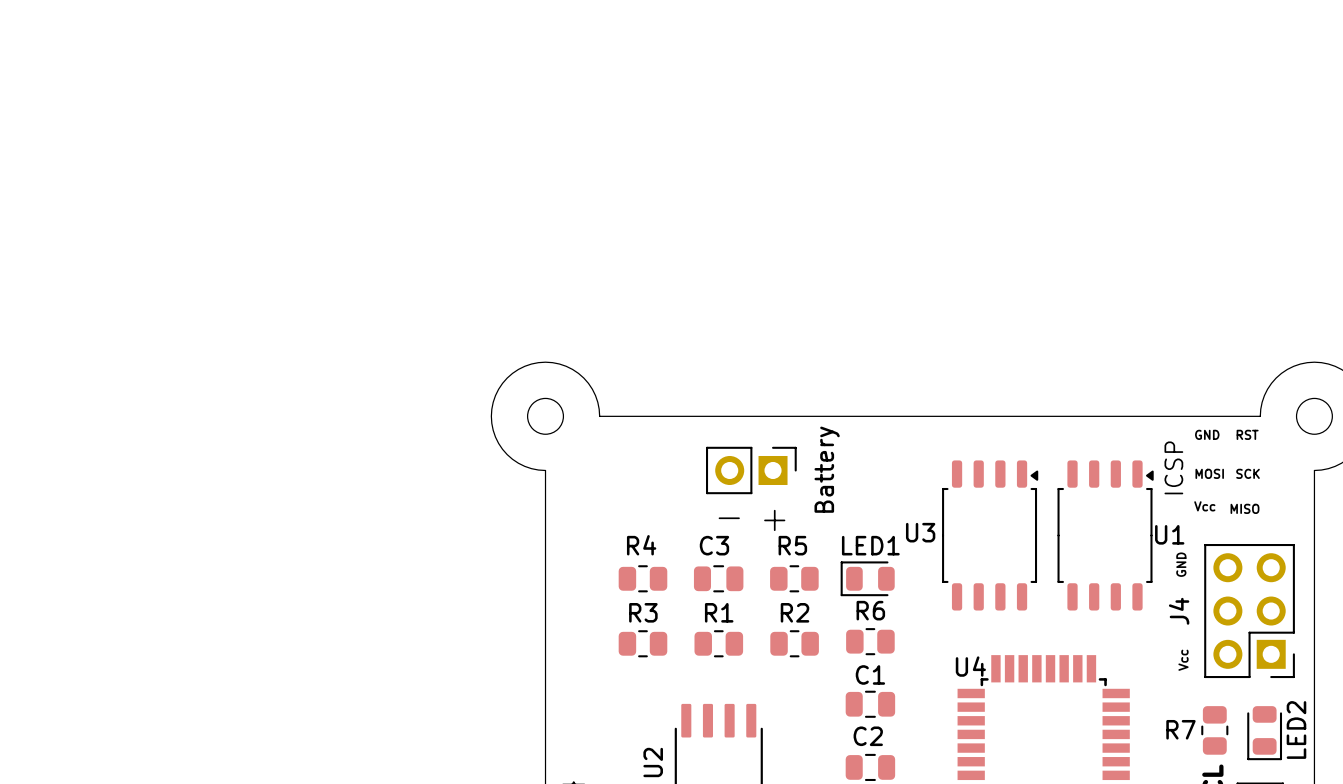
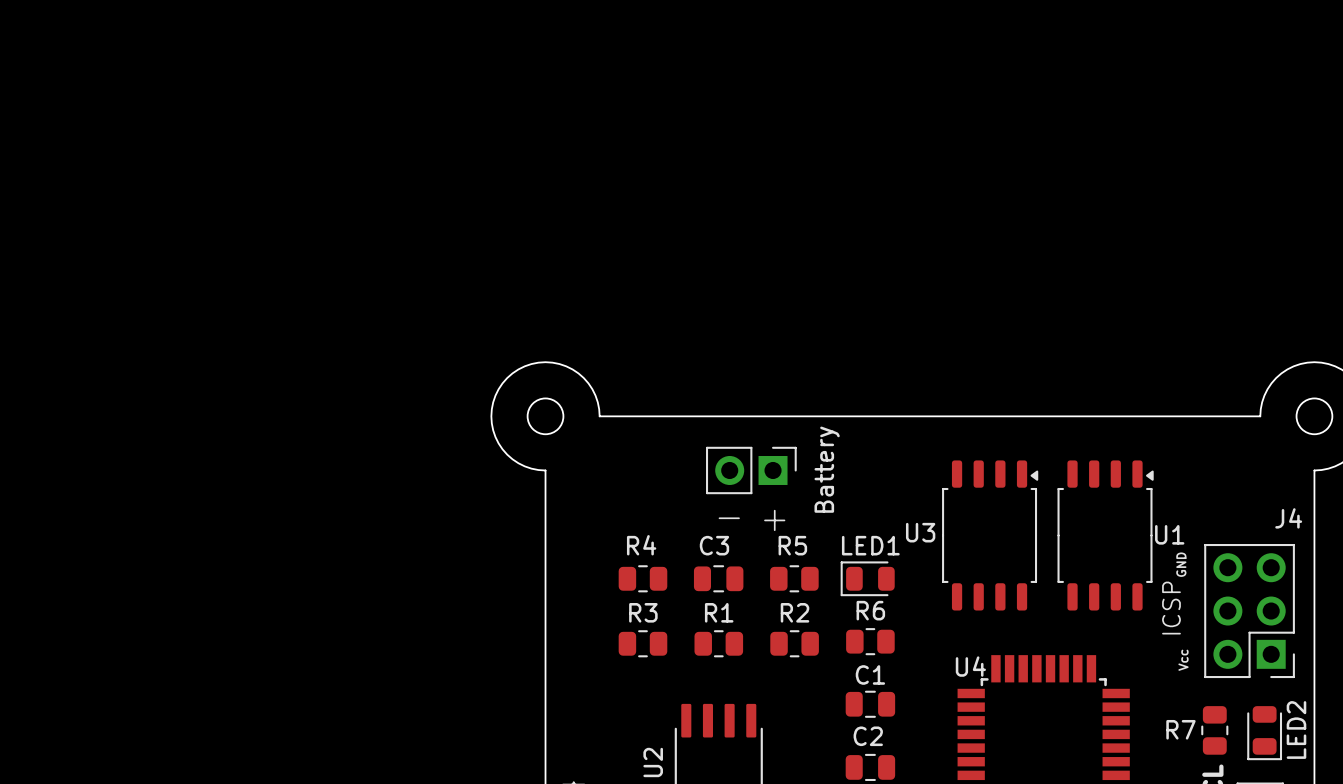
text: GND (1207, 434) -> none
text: RST (1247, 434) -> none
text position: ICSP (1173, 467) -> ICSP (1171, 608)
text: MOSI (1209, 473) -> none
text: SCK (1248, 473) -> none
text: Vcc (1204, 506) -> none
text: MISO (1244, 508) -> none
J4 name rotation: 0° (1179, 611) -> 90° clockwise (1288, 518)
J4 name position: J4 (1179, 611) -> J4 (1288, 518)

